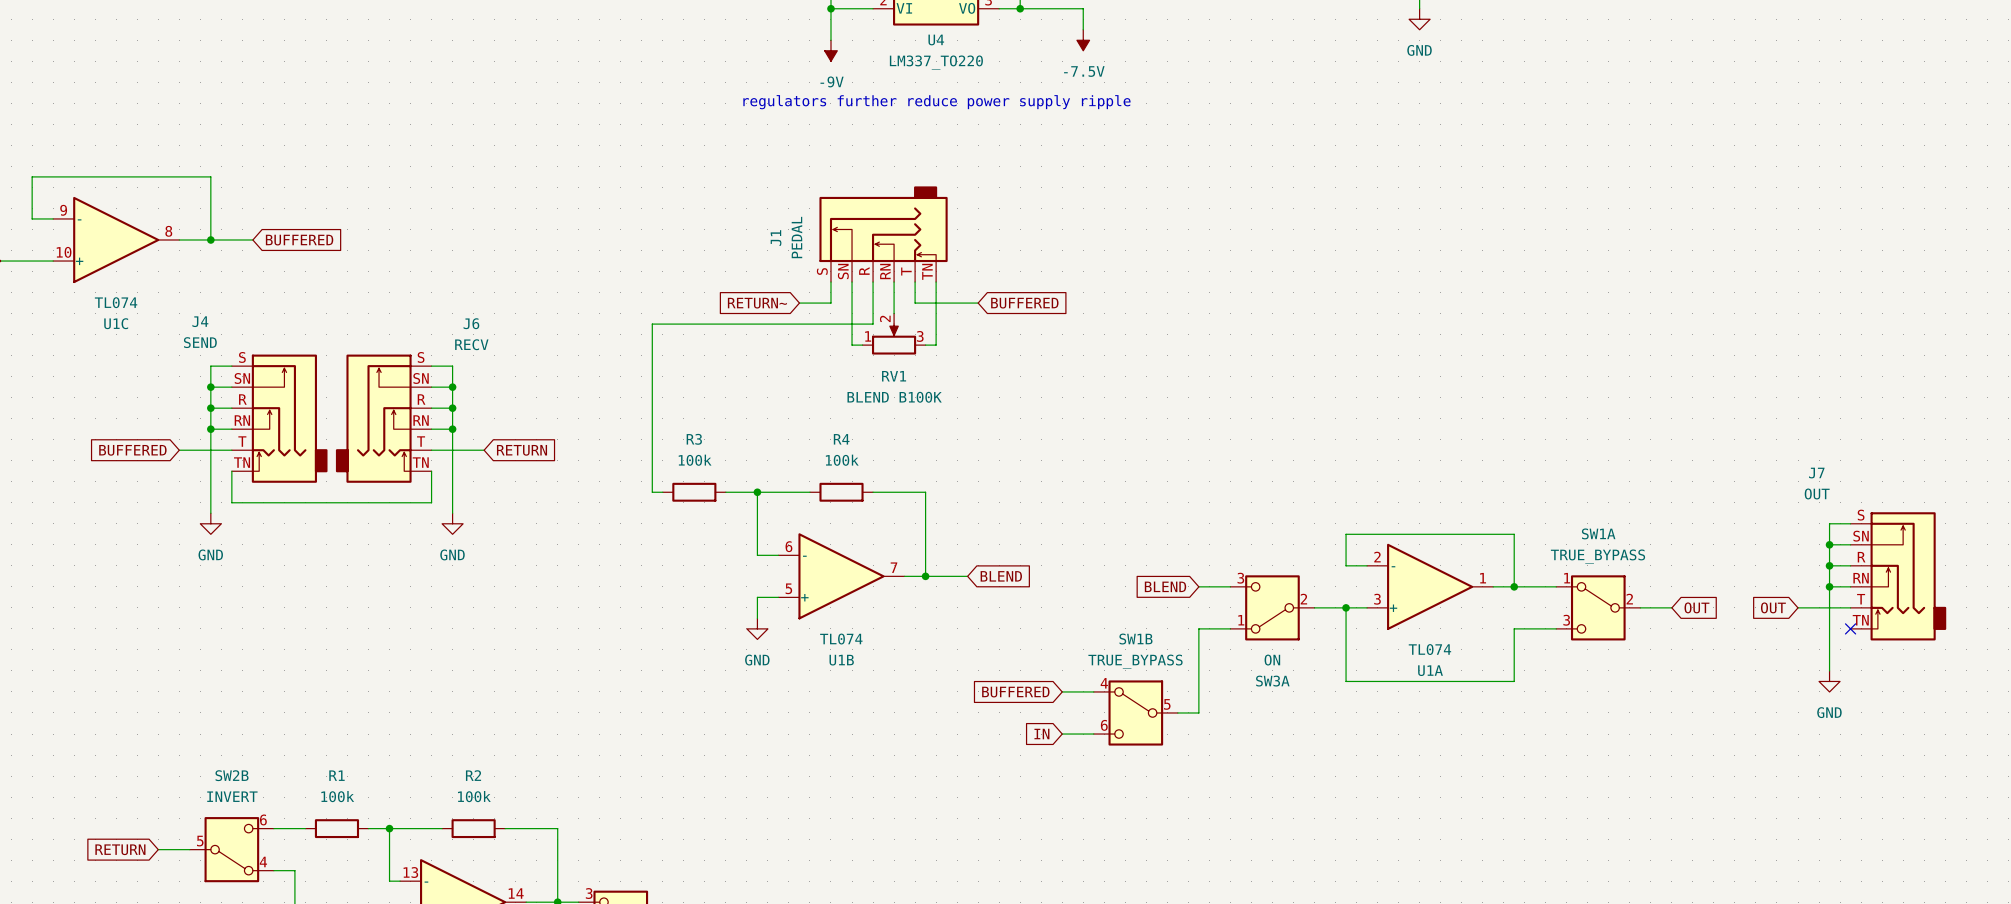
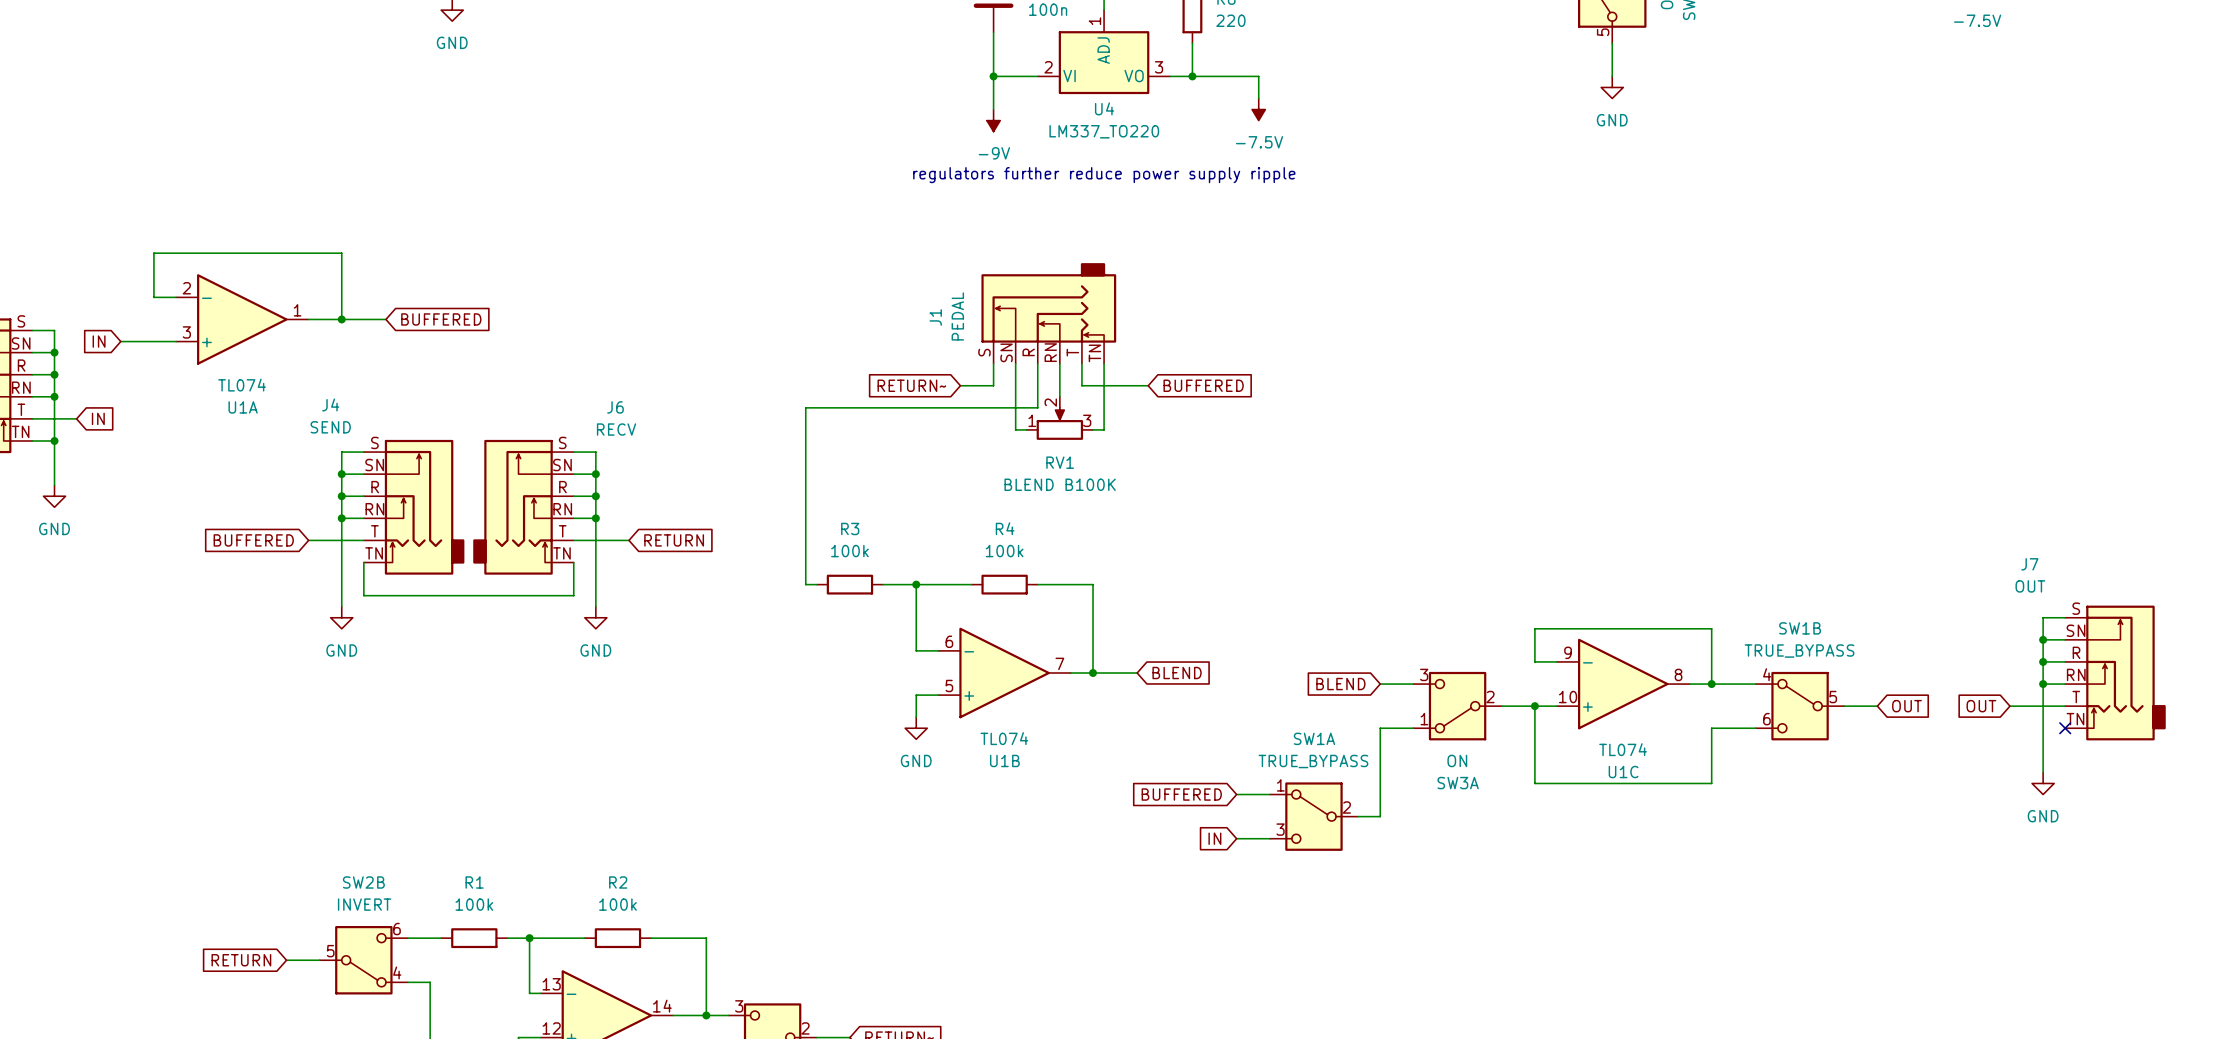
U1C position: (116, 239) -> (1623, 684)
U1A position: (1430, 586) -> (242, 319)
SW1A position: (1598, 607) -> (1313, 816)
SW1B position: (1135, 712) -> (1800, 706)

